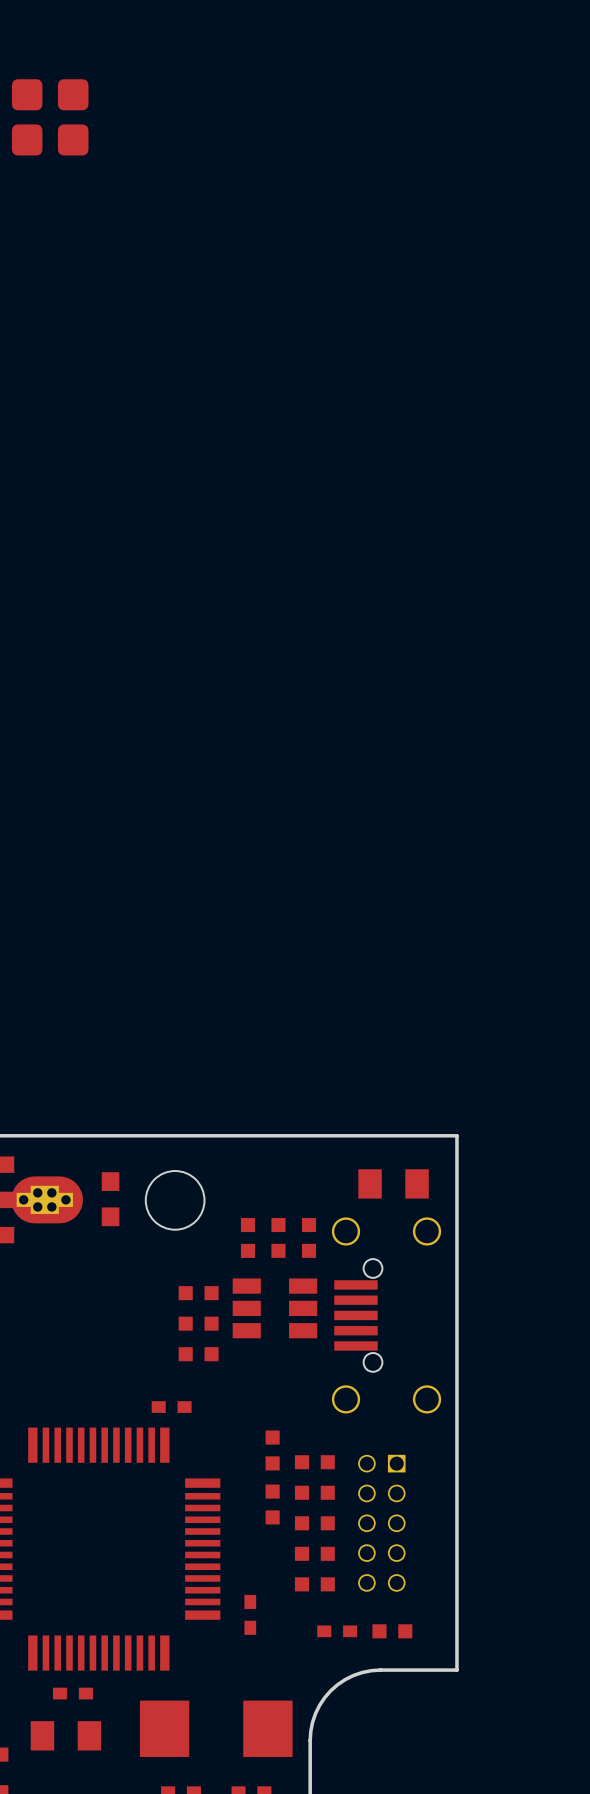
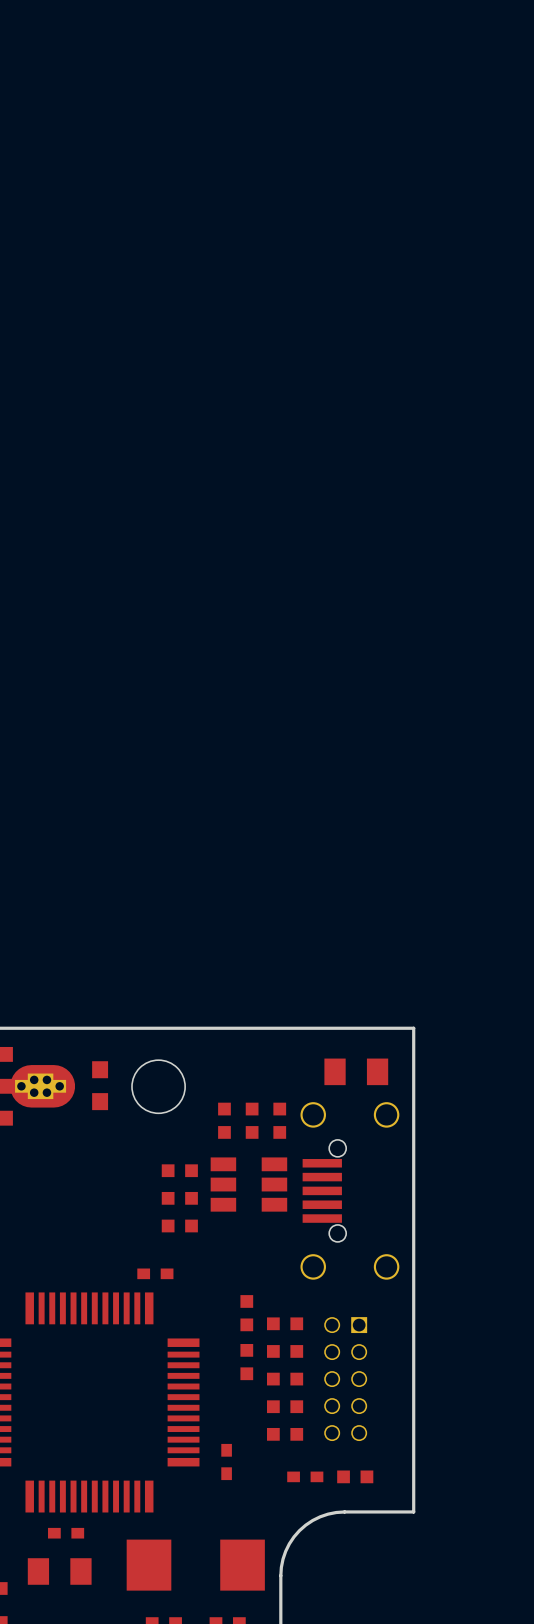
part: (27, 117) -> none
part: (73, 117) -> none

